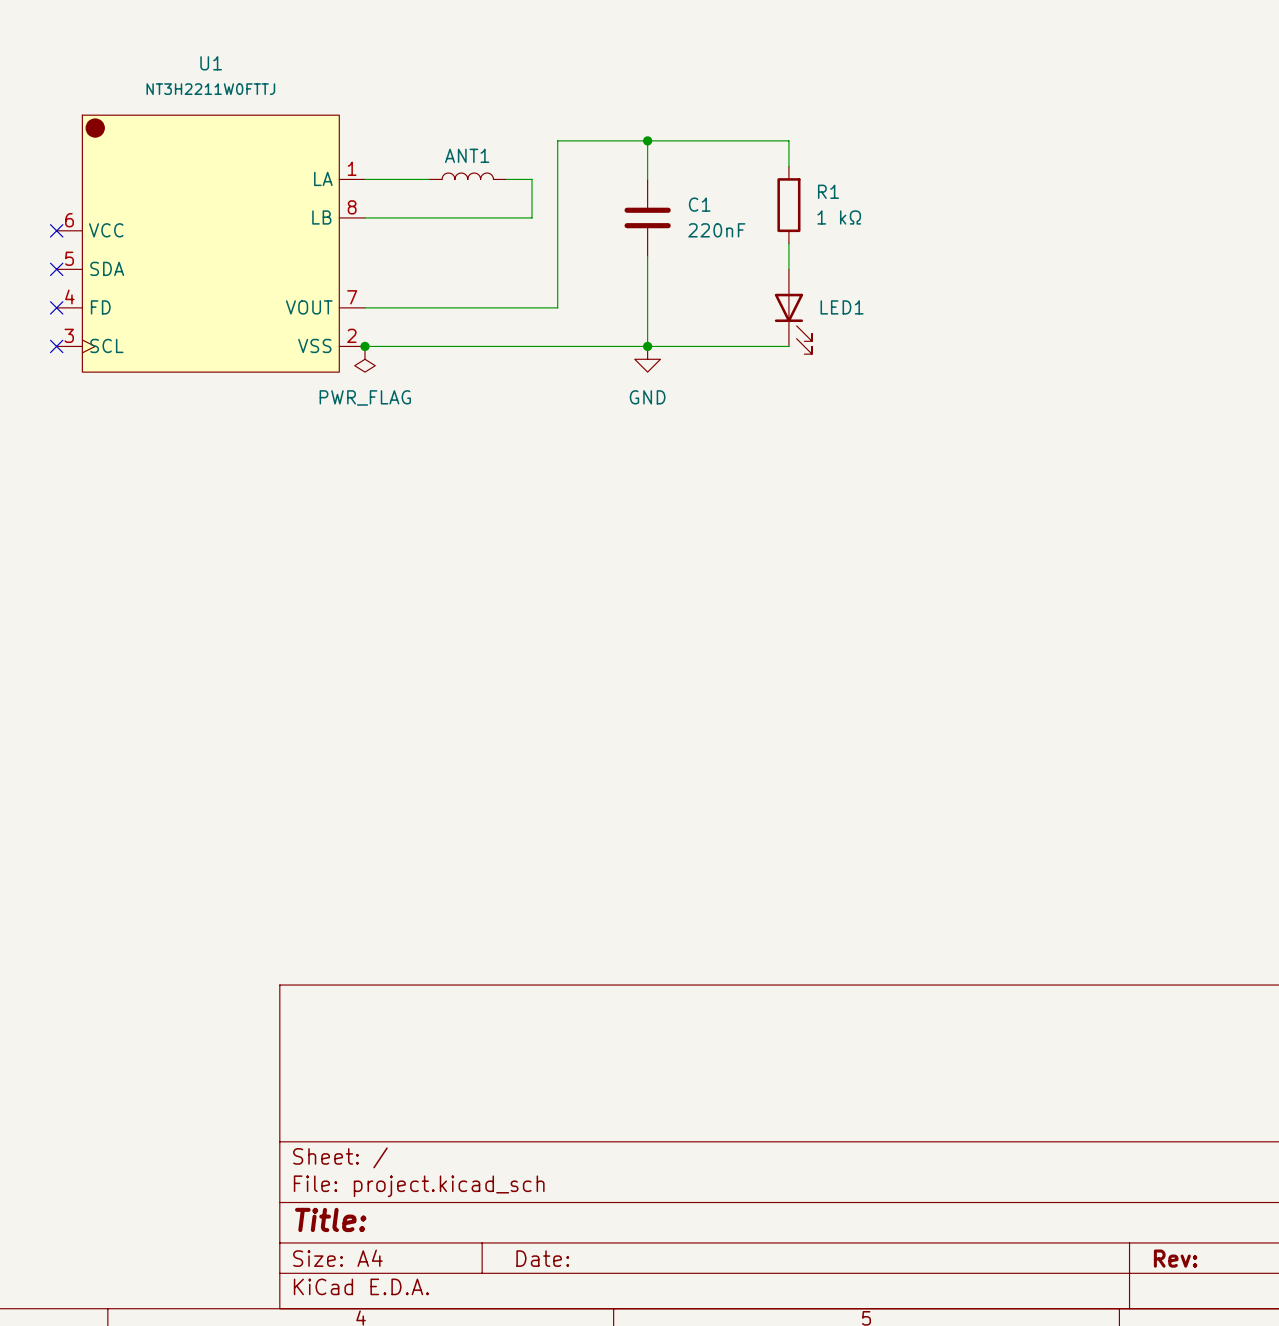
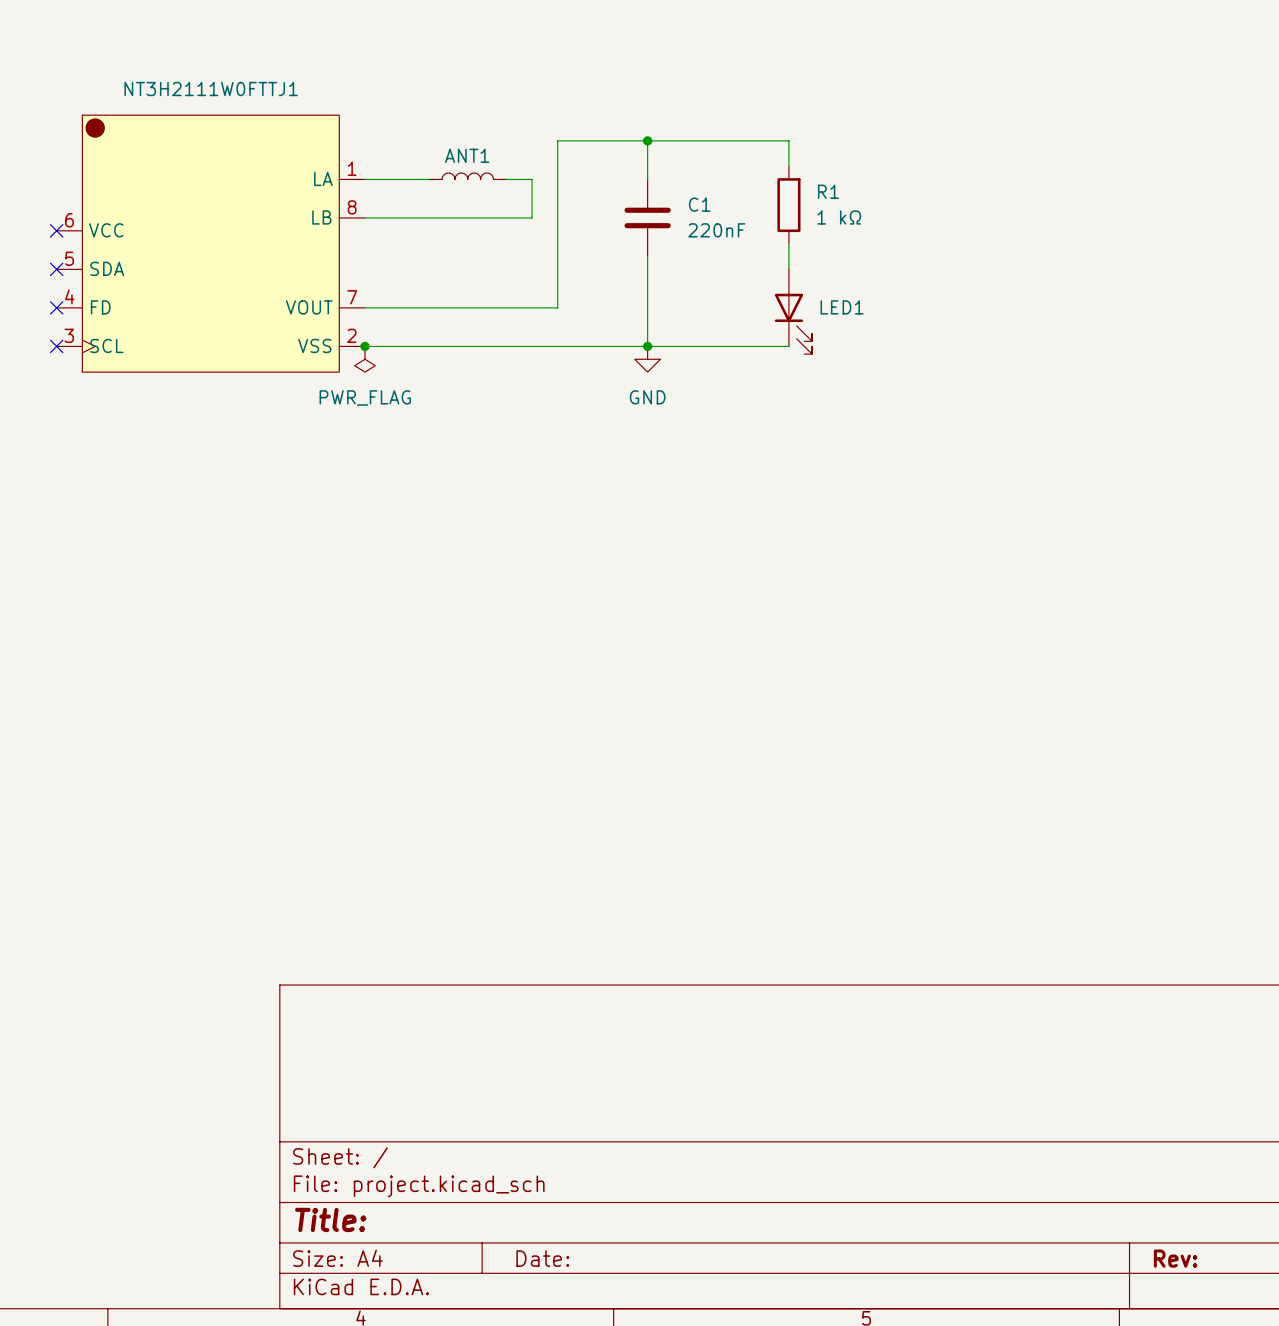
U1 name: U1 (211, 63) -> NT3H2111W0FTTJ1 (211, 89)
U1 value: NT3H2211W0FTTJ (210, 89) -> none

